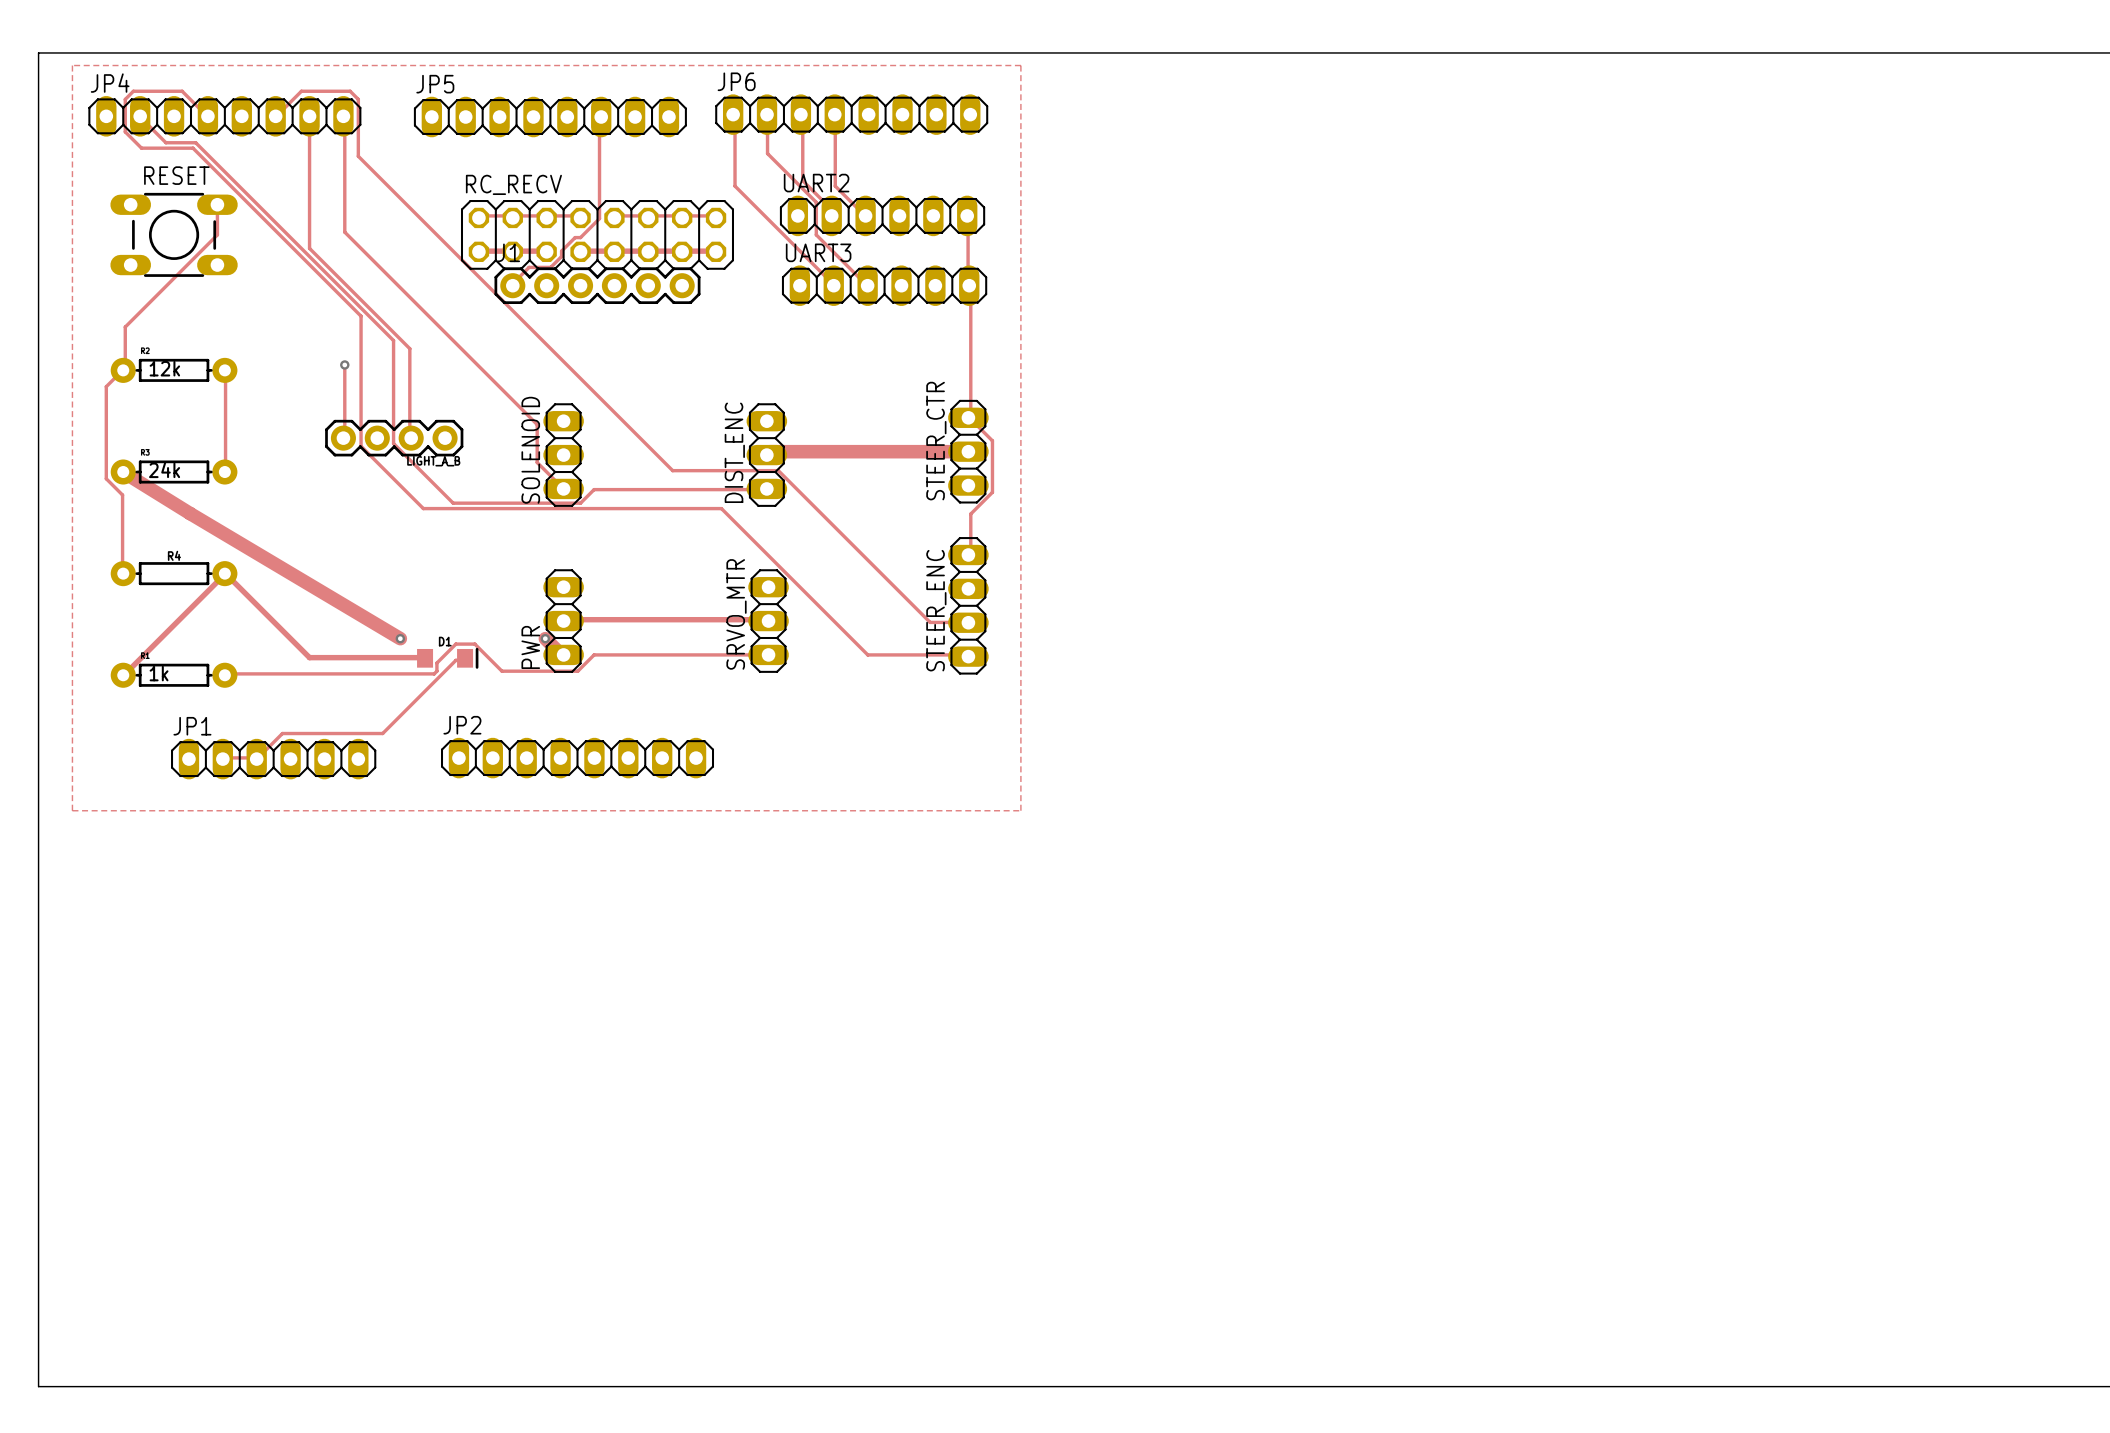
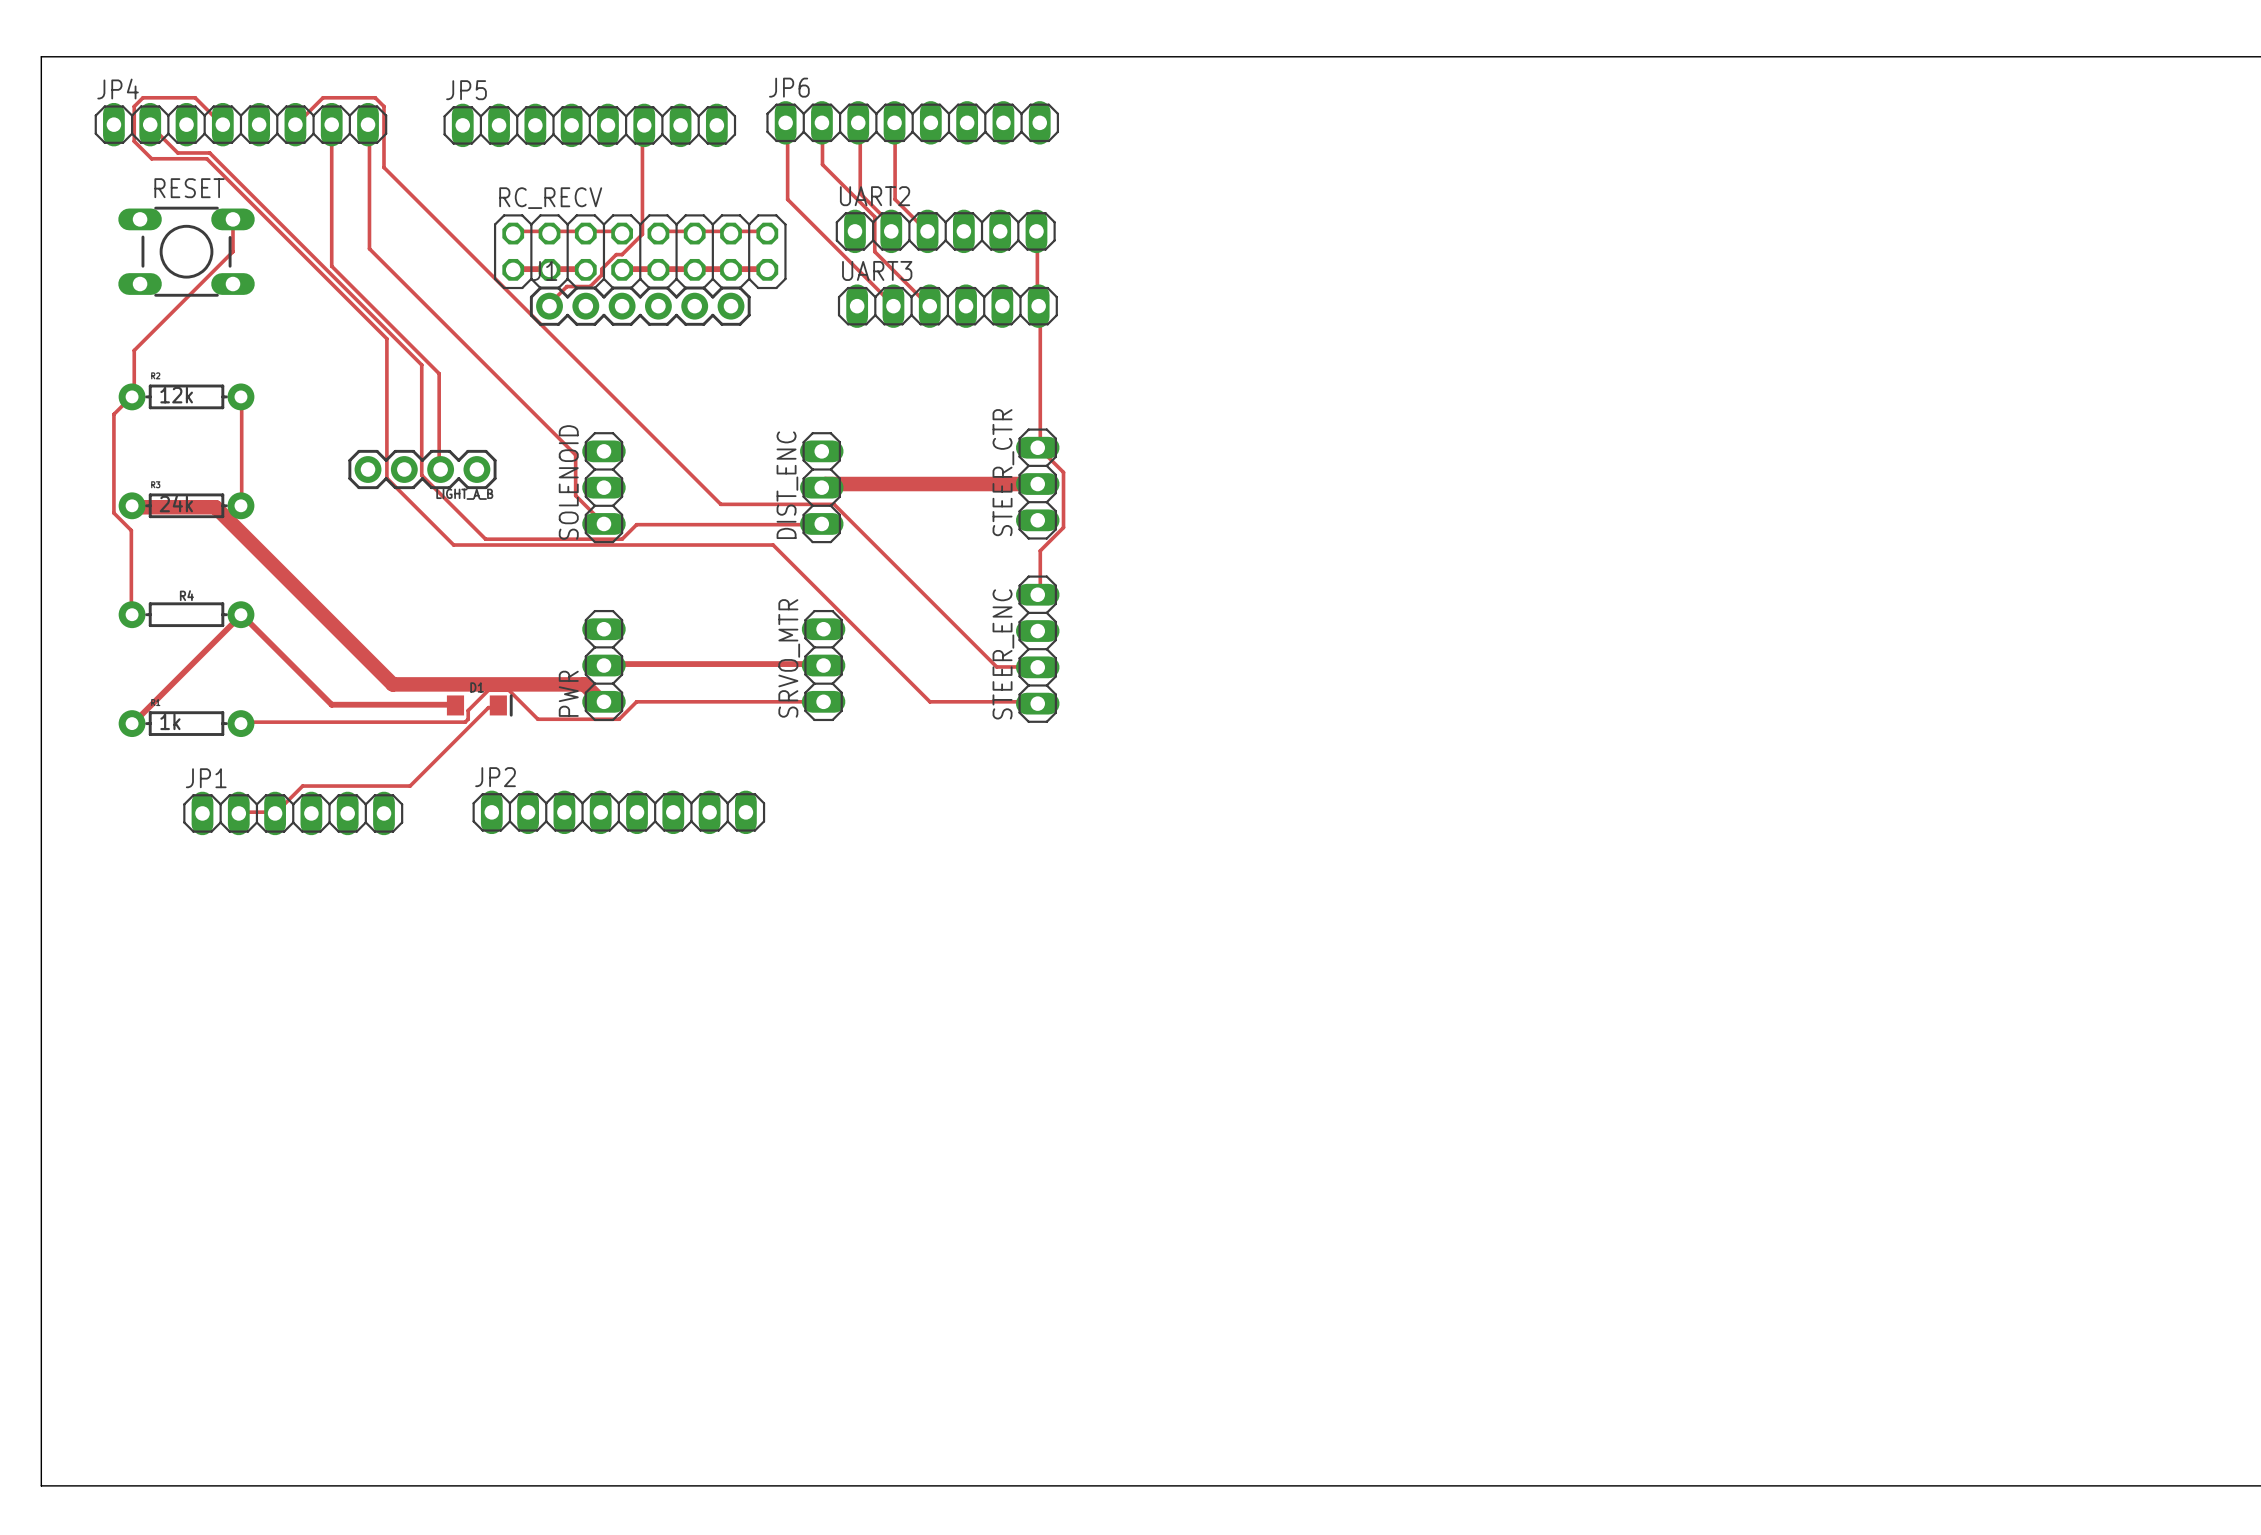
zone outline: (72, 65) (72, 810) (1020, 810) (1020, 65) (72, 65) -> none
track: (344, 364) (343, 438) -> none
via: (344, 364) -> none
track: (125, 473) (400, 638) -> (134, 507) (215, 507) (392, 684) (584, 684)
via: (400, 638) -> none
via: (545, 638) -> none

